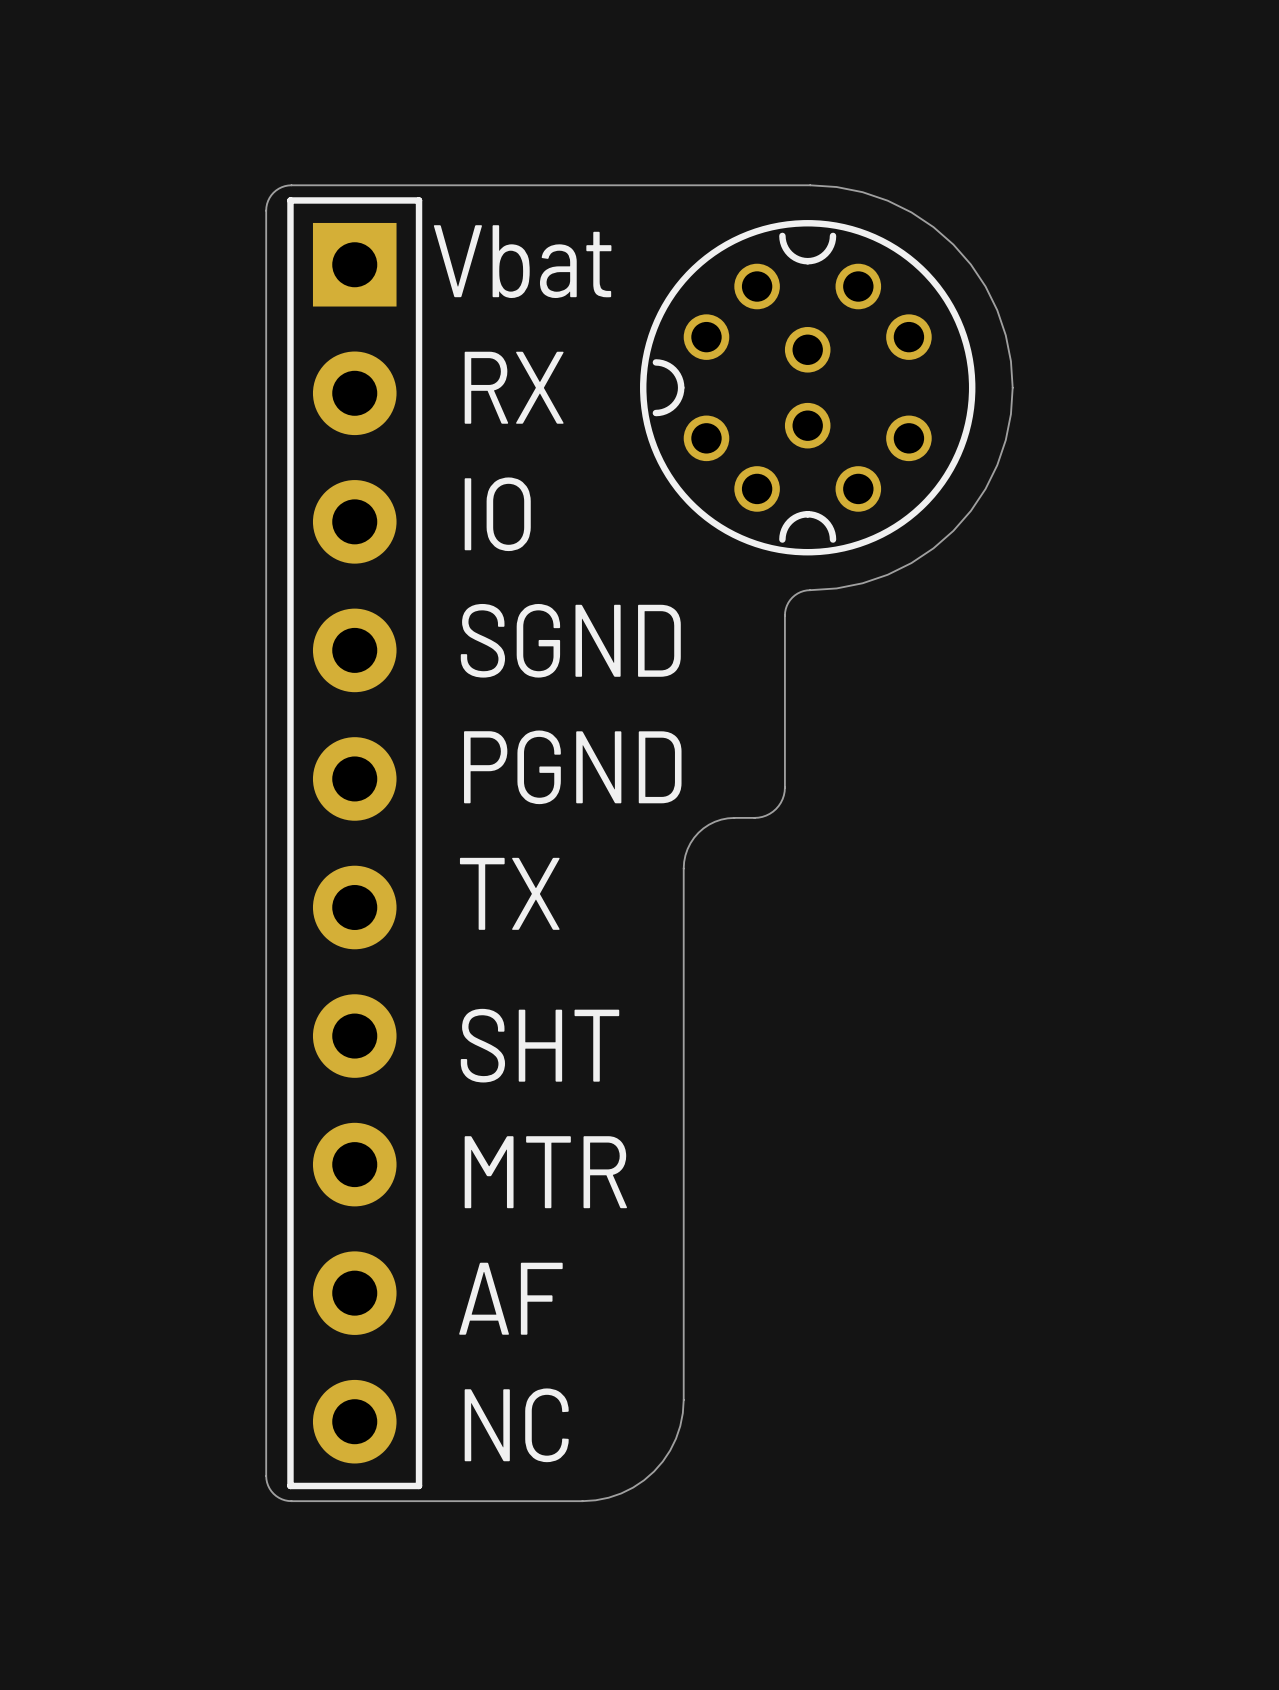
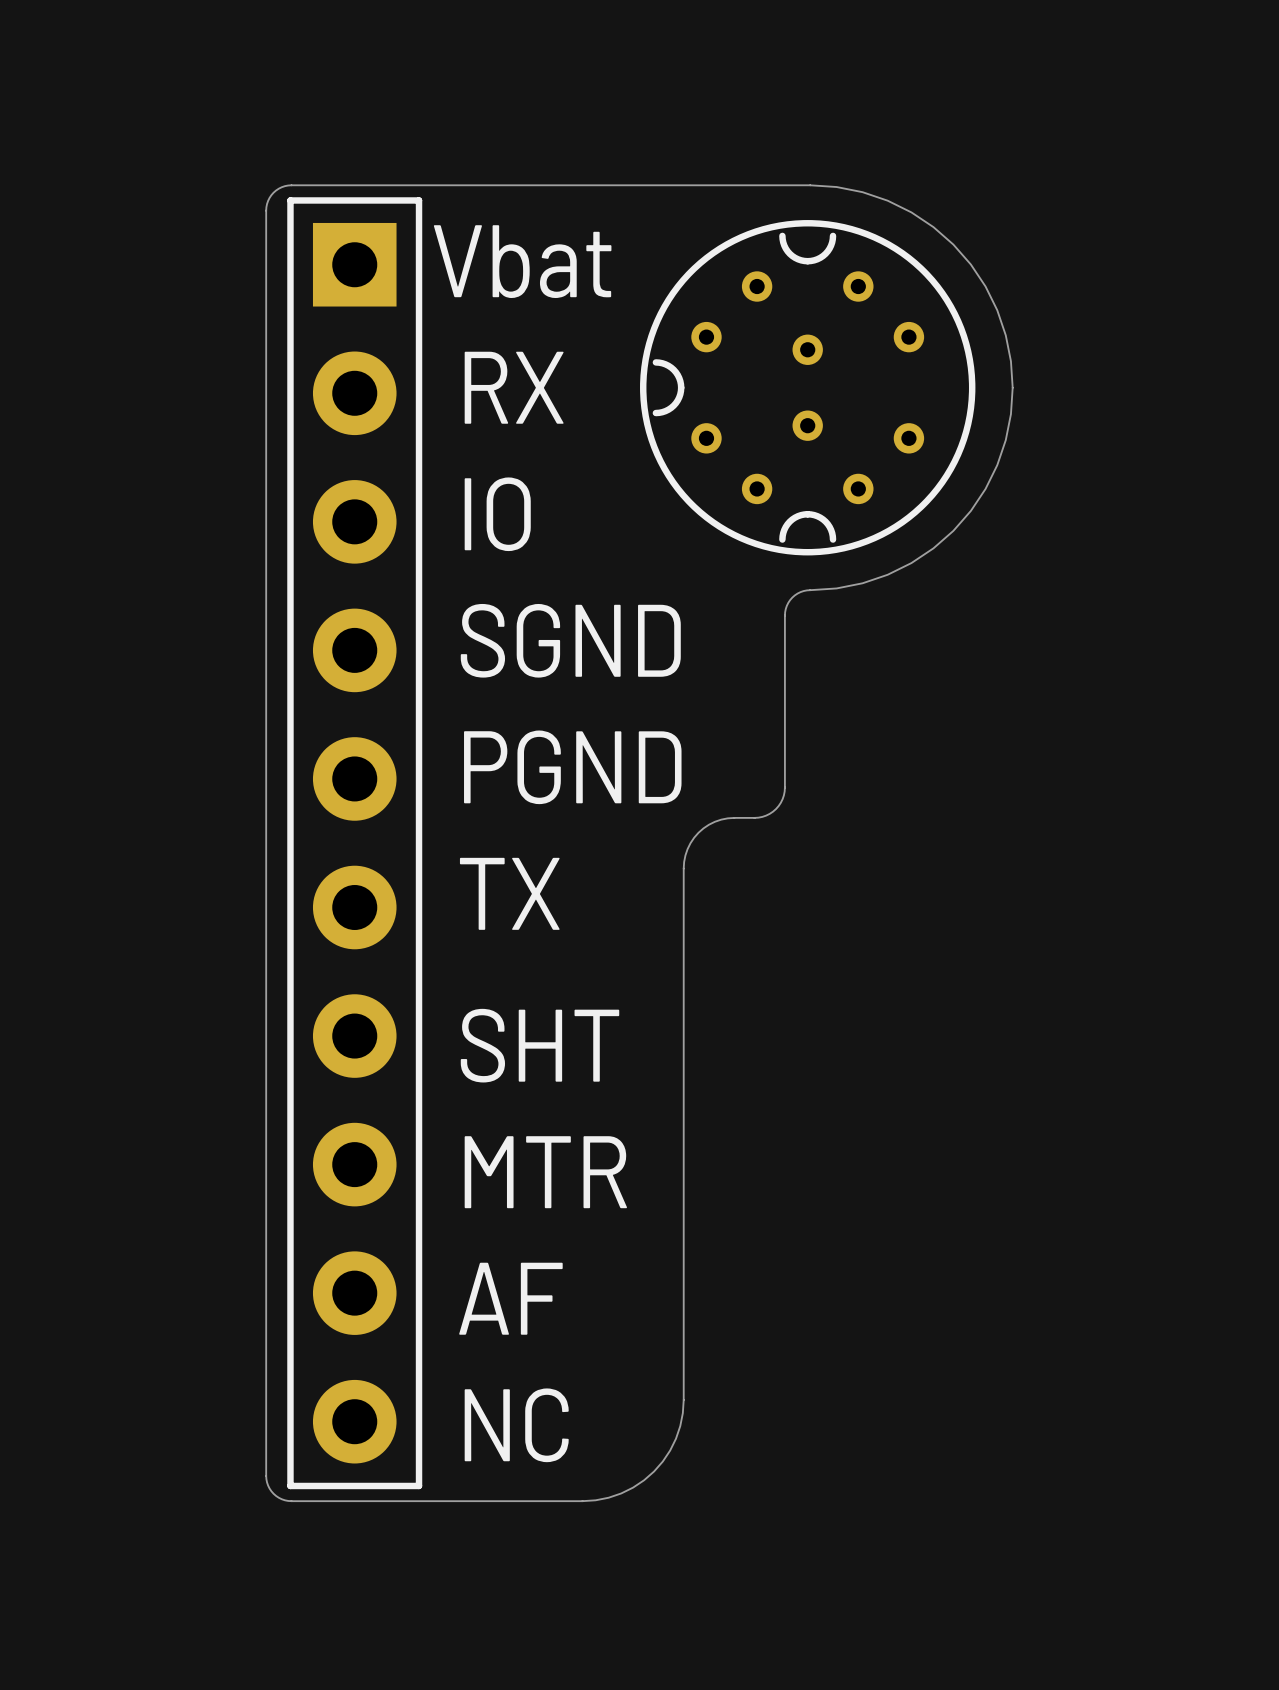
part footprint: [640, 220, 976, 556] -> [640, 220, 976, 556]

